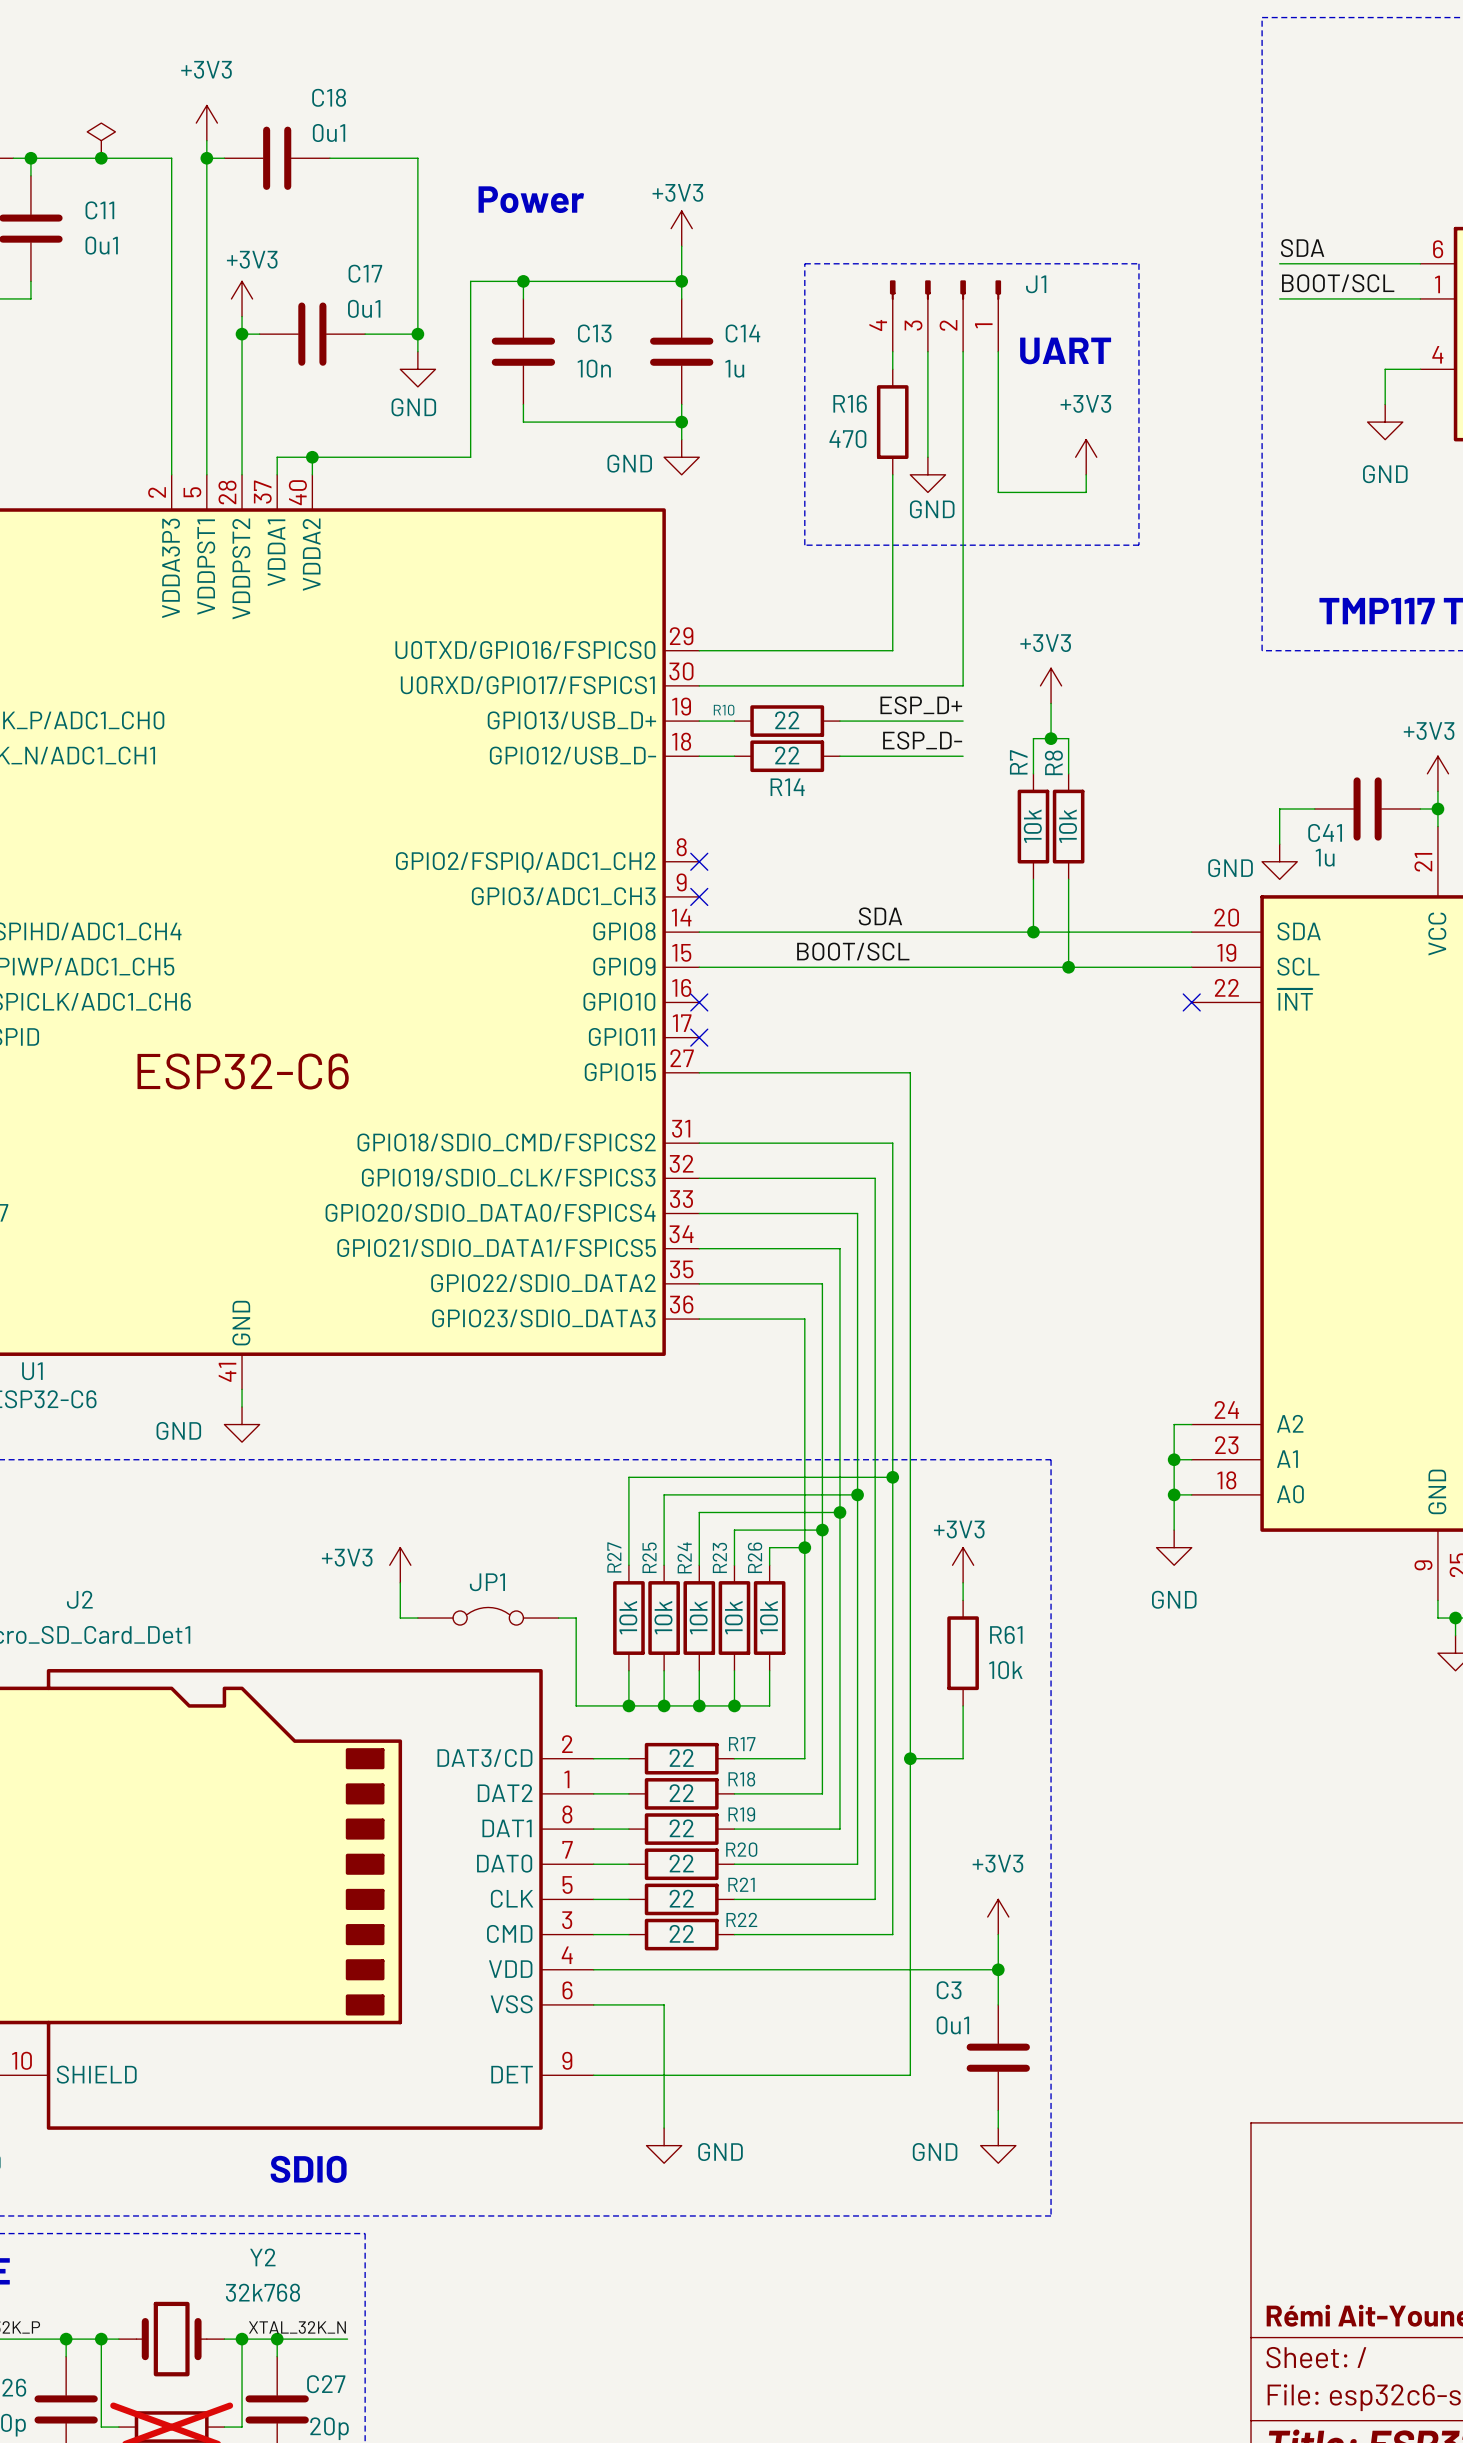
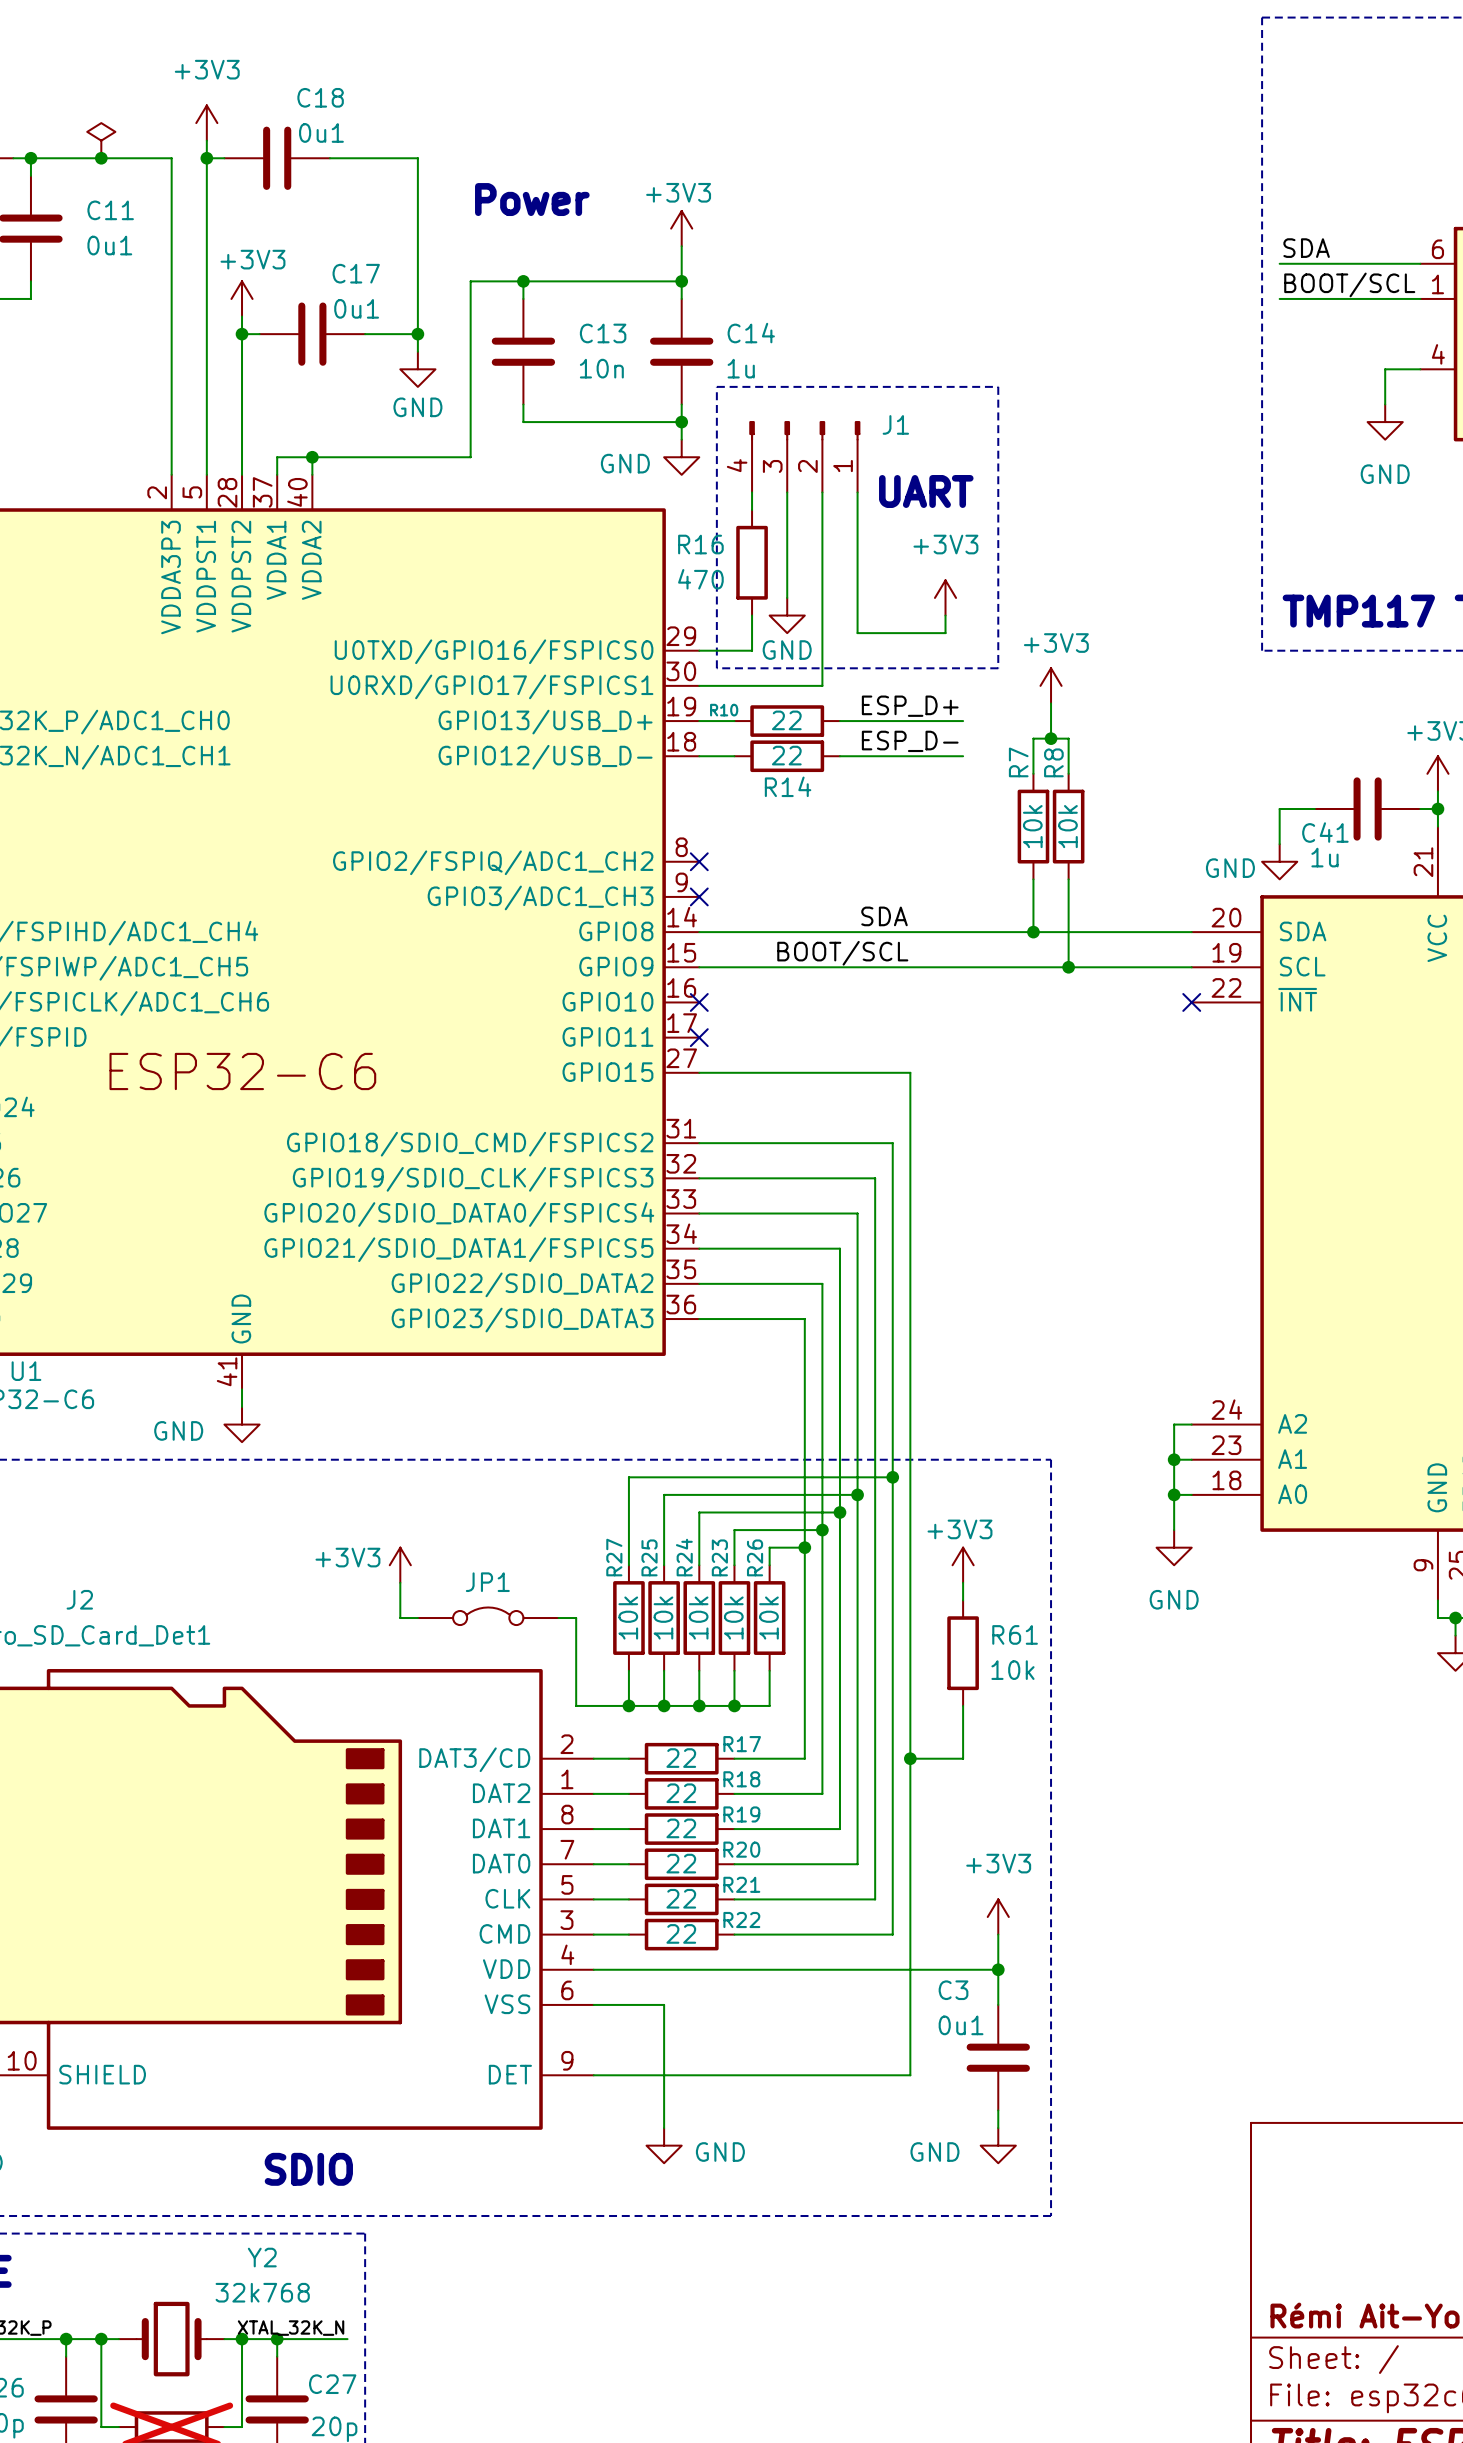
line: (804, 263) (1138, 263) (1138, 545) (804, 545) (804, 263) -> none
J1 position: (945, 316) -> (804, 456)
text position: UART (1065, 350) -> UART (926, 491)
wire: (892, 351) (892, 369) -> (752, 492) (752, 510)
wire: (927, 351) (927, 457) -> (787, 492) (787, 597)
wire: (963, 351) (963, 685) (822, 685) -> (822, 492) (822, 685)
wire: (998, 351) (998, 492) (1086, 492) (1086, 474) -> (857, 492) (857, 633) (945, 633) (945, 615)
line: none -> (716, 386) (998, 386) (998, 668) (716, 668) (716, 386)
R16 position: (892, 422) -> (752, 562)
power symbol position: +3V3 (1086, 457) -> +3V3 (945, 597)
wire: (892, 474) (892, 650) (752, 650) -> (752, 615) (752, 650)
power symbol position: GND (927, 474) -> GND (787, 615)

